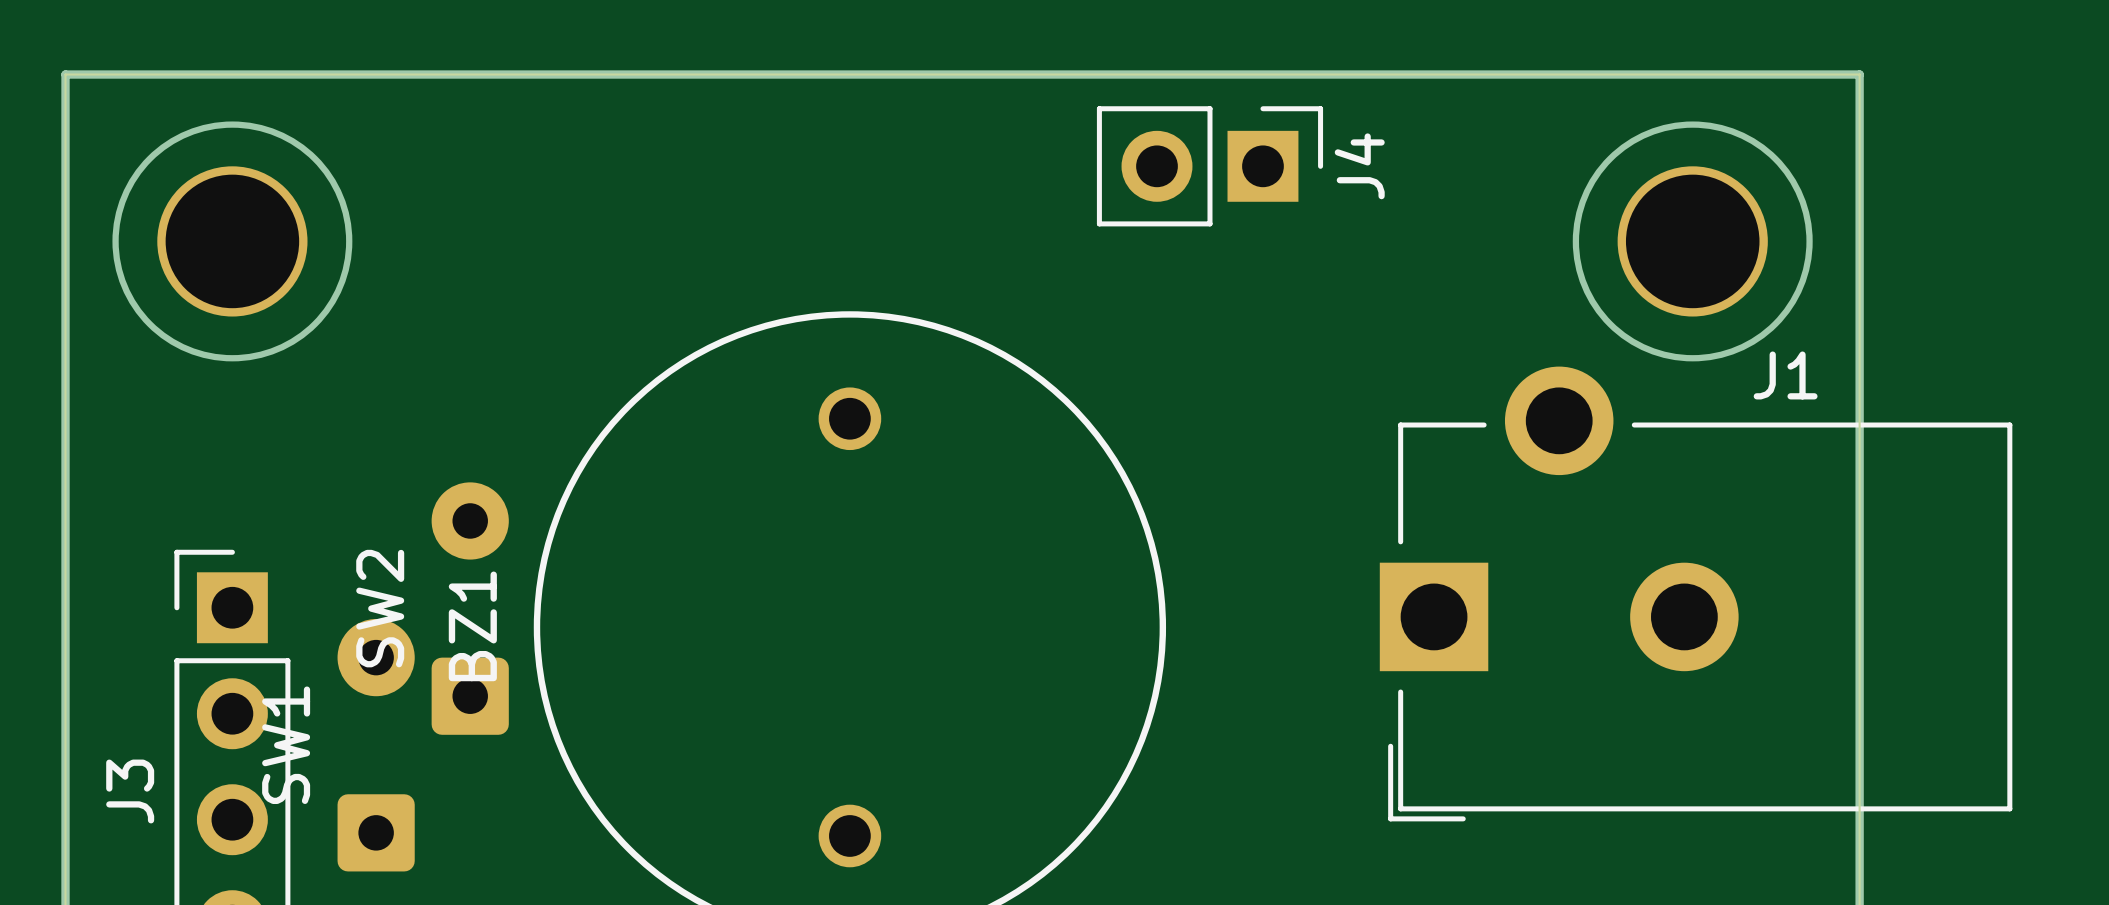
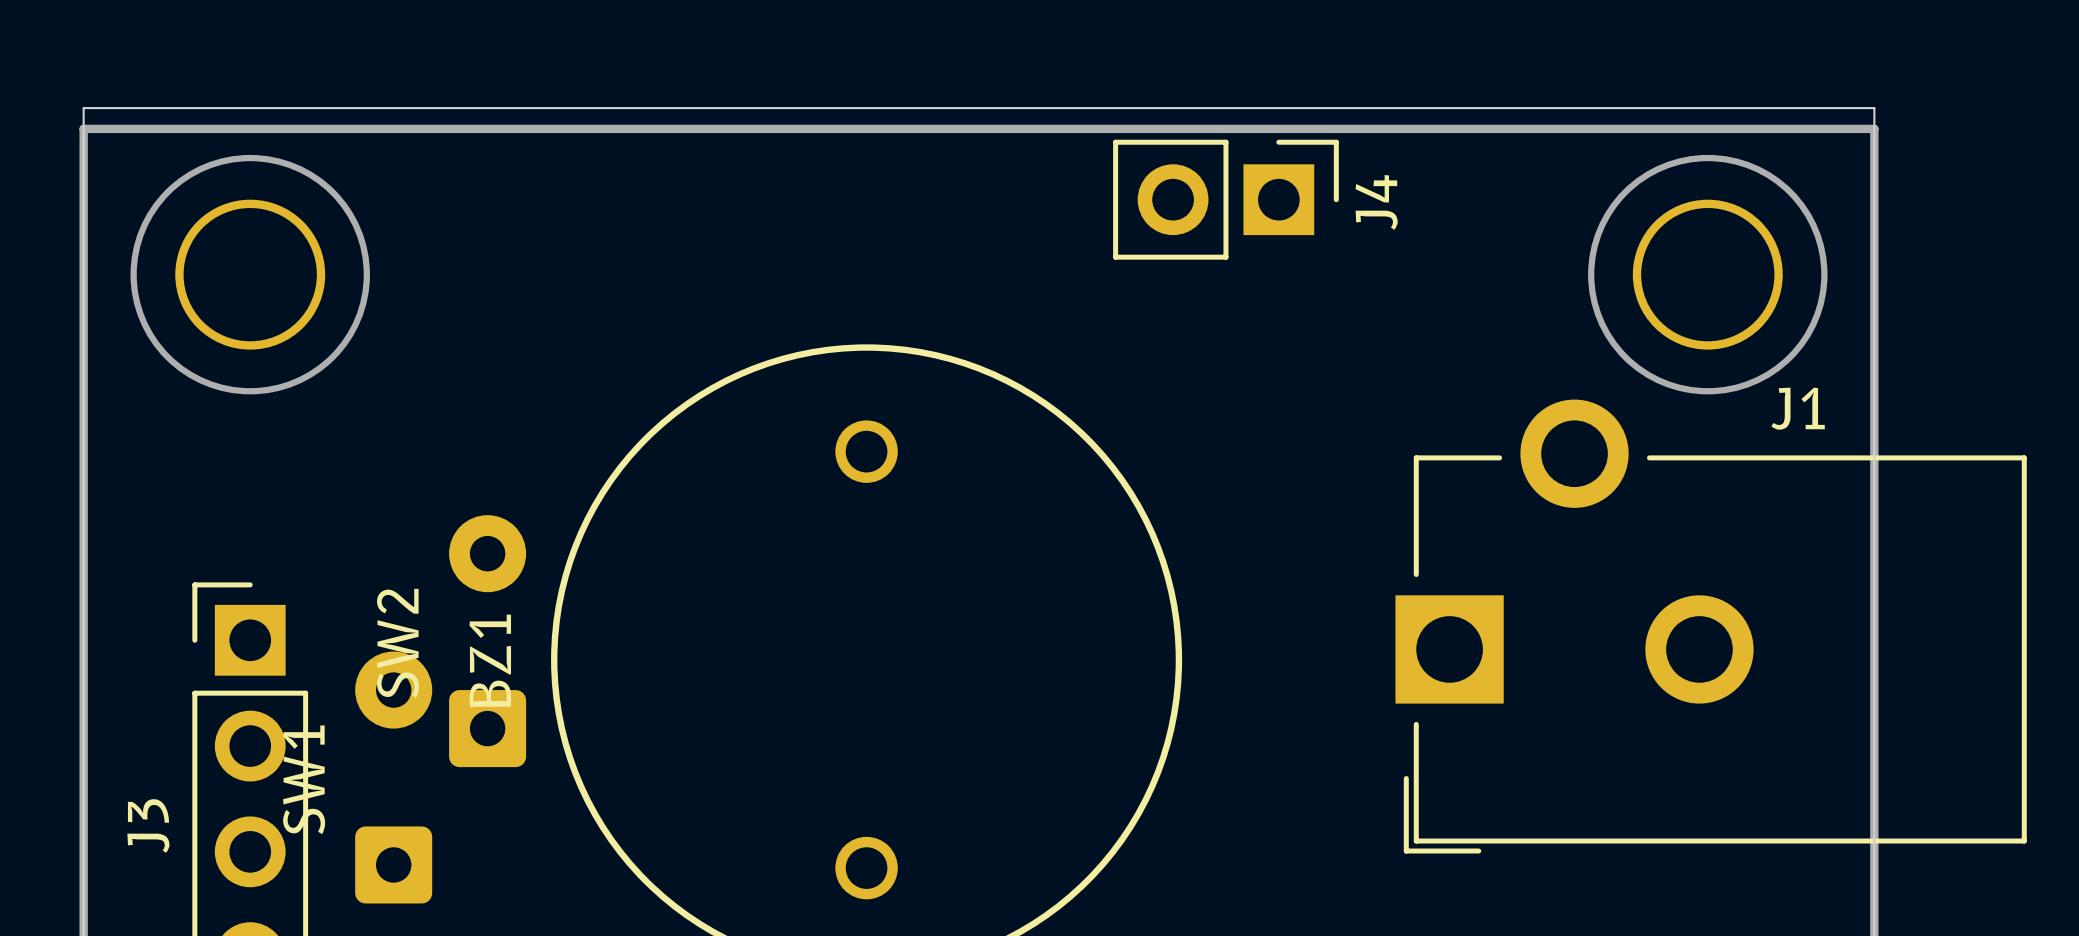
line: (65, 95) (65, 74) (1859, 74) (1859, 95) -> (83, 128) (1874, 128)

